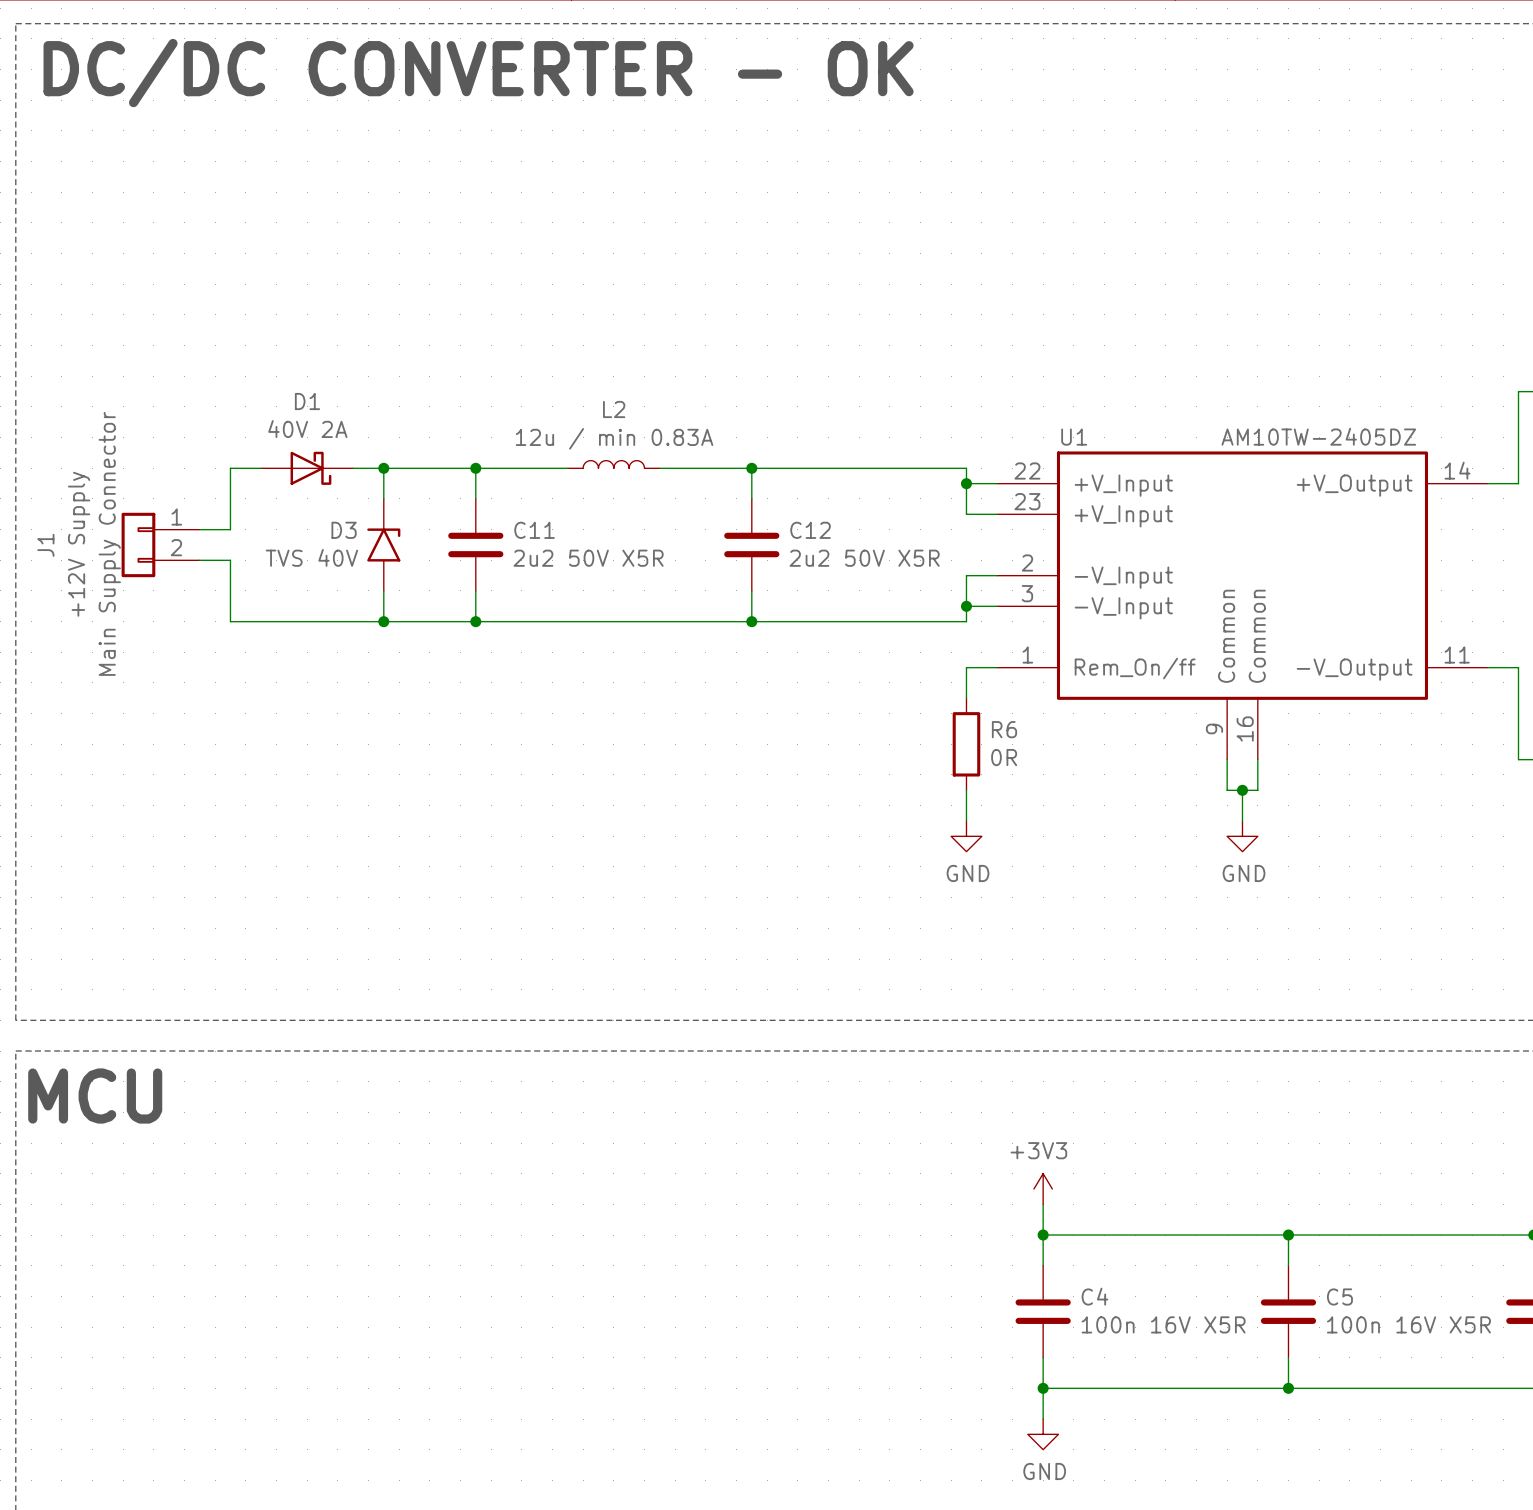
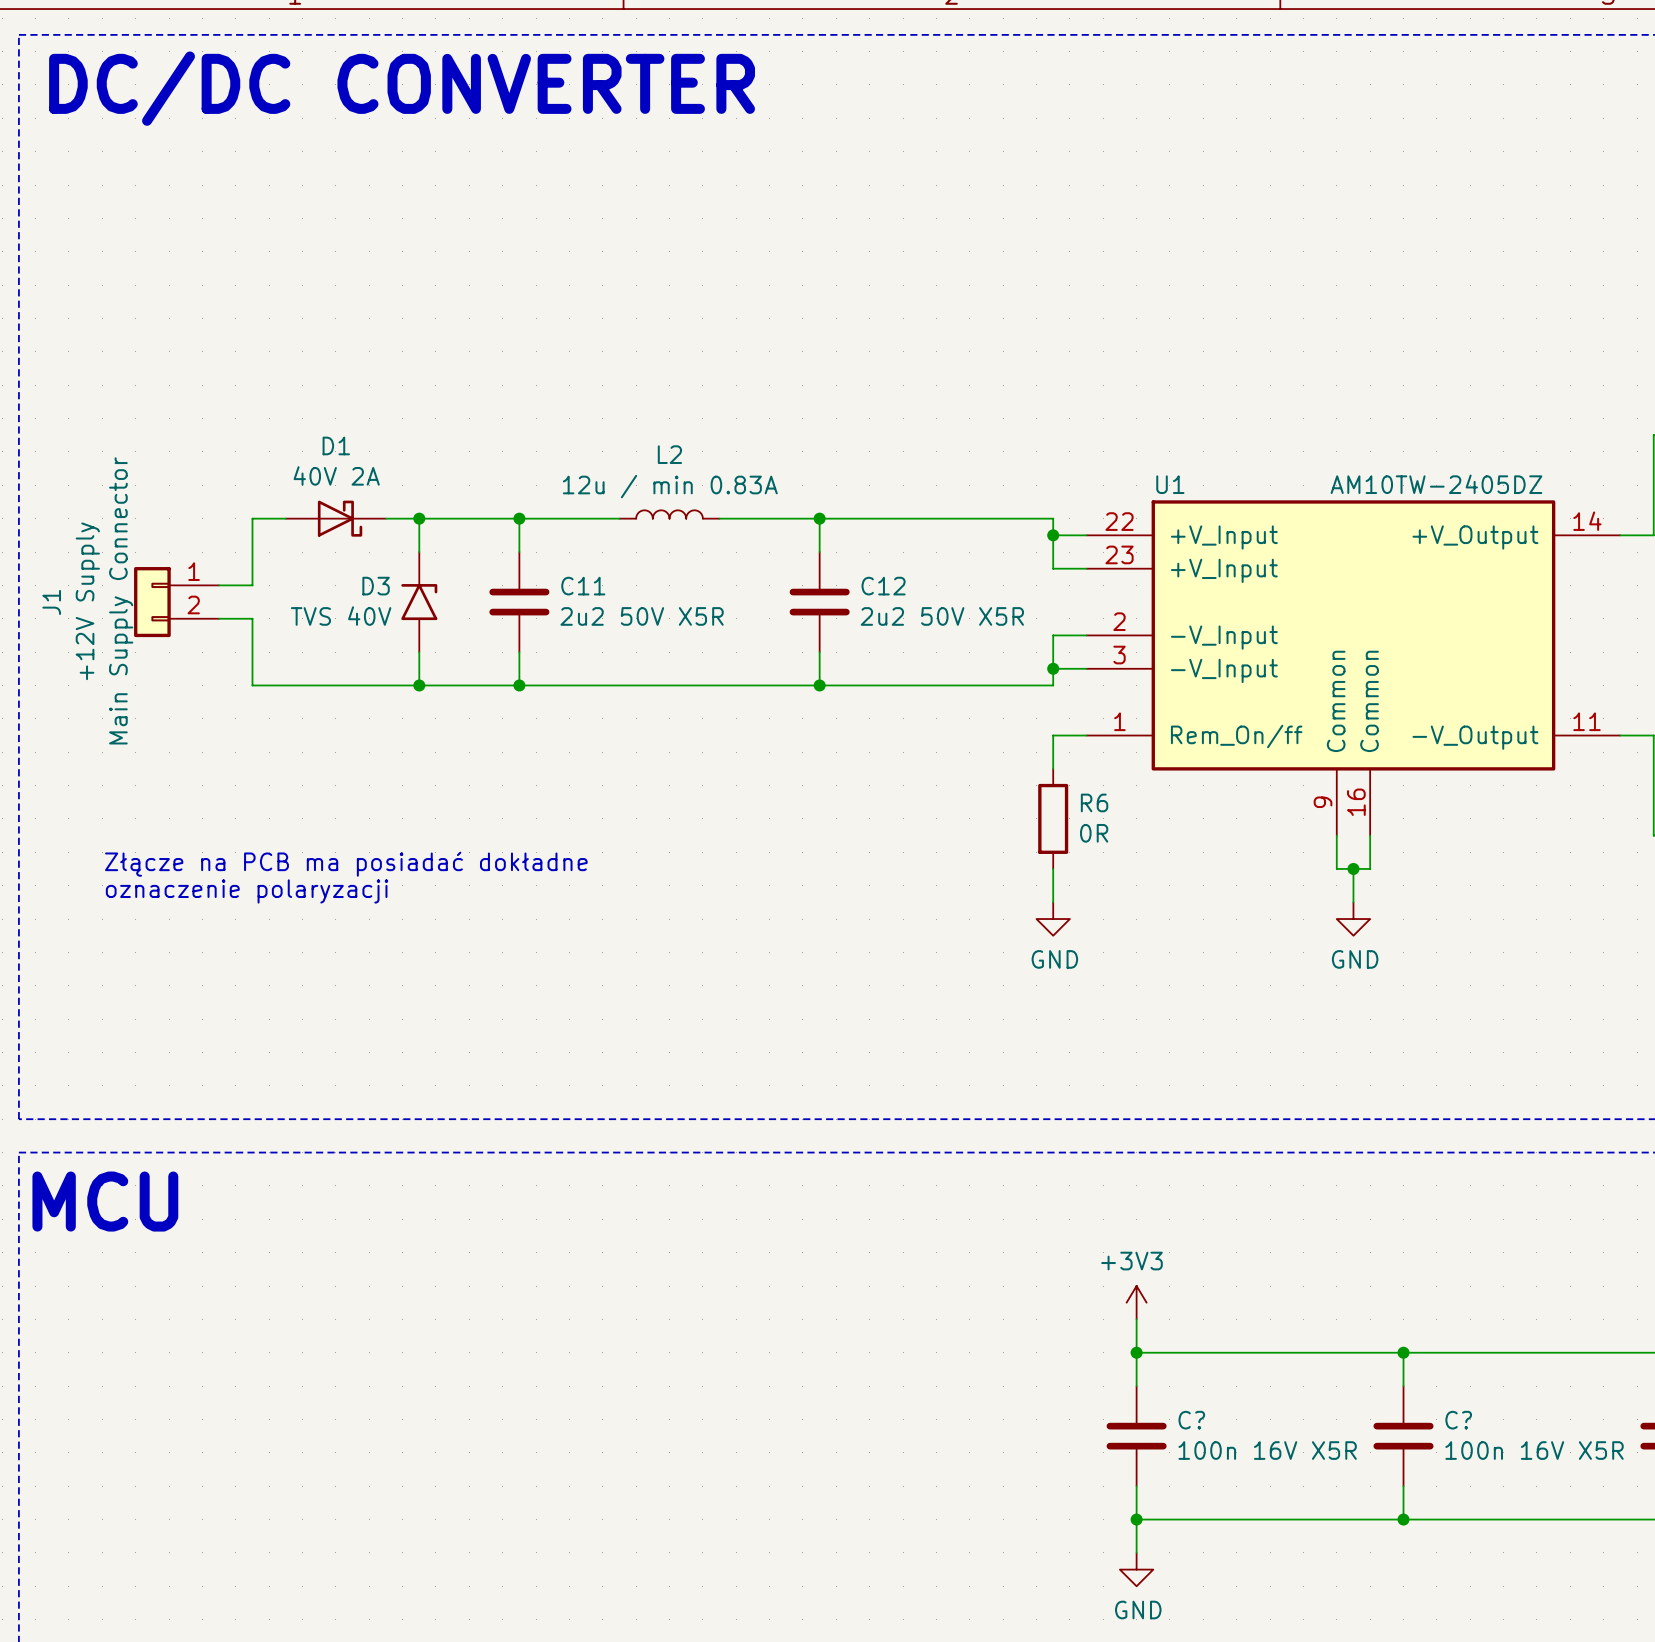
text: DC/DC CONVERTER - OK (478, 73) -> DC/DC CONVERTER (402, 88)
text: none -> Złącze na PCB ma posiadać dokładne (346, 864)
text: none -> oznaczenie polaryzacji (247, 891)
C4 name: C4 (1094, 1296) -> C? (1191, 1420)
C5 name: C5 (1339, 1296) -> C? (1458, 1420)

